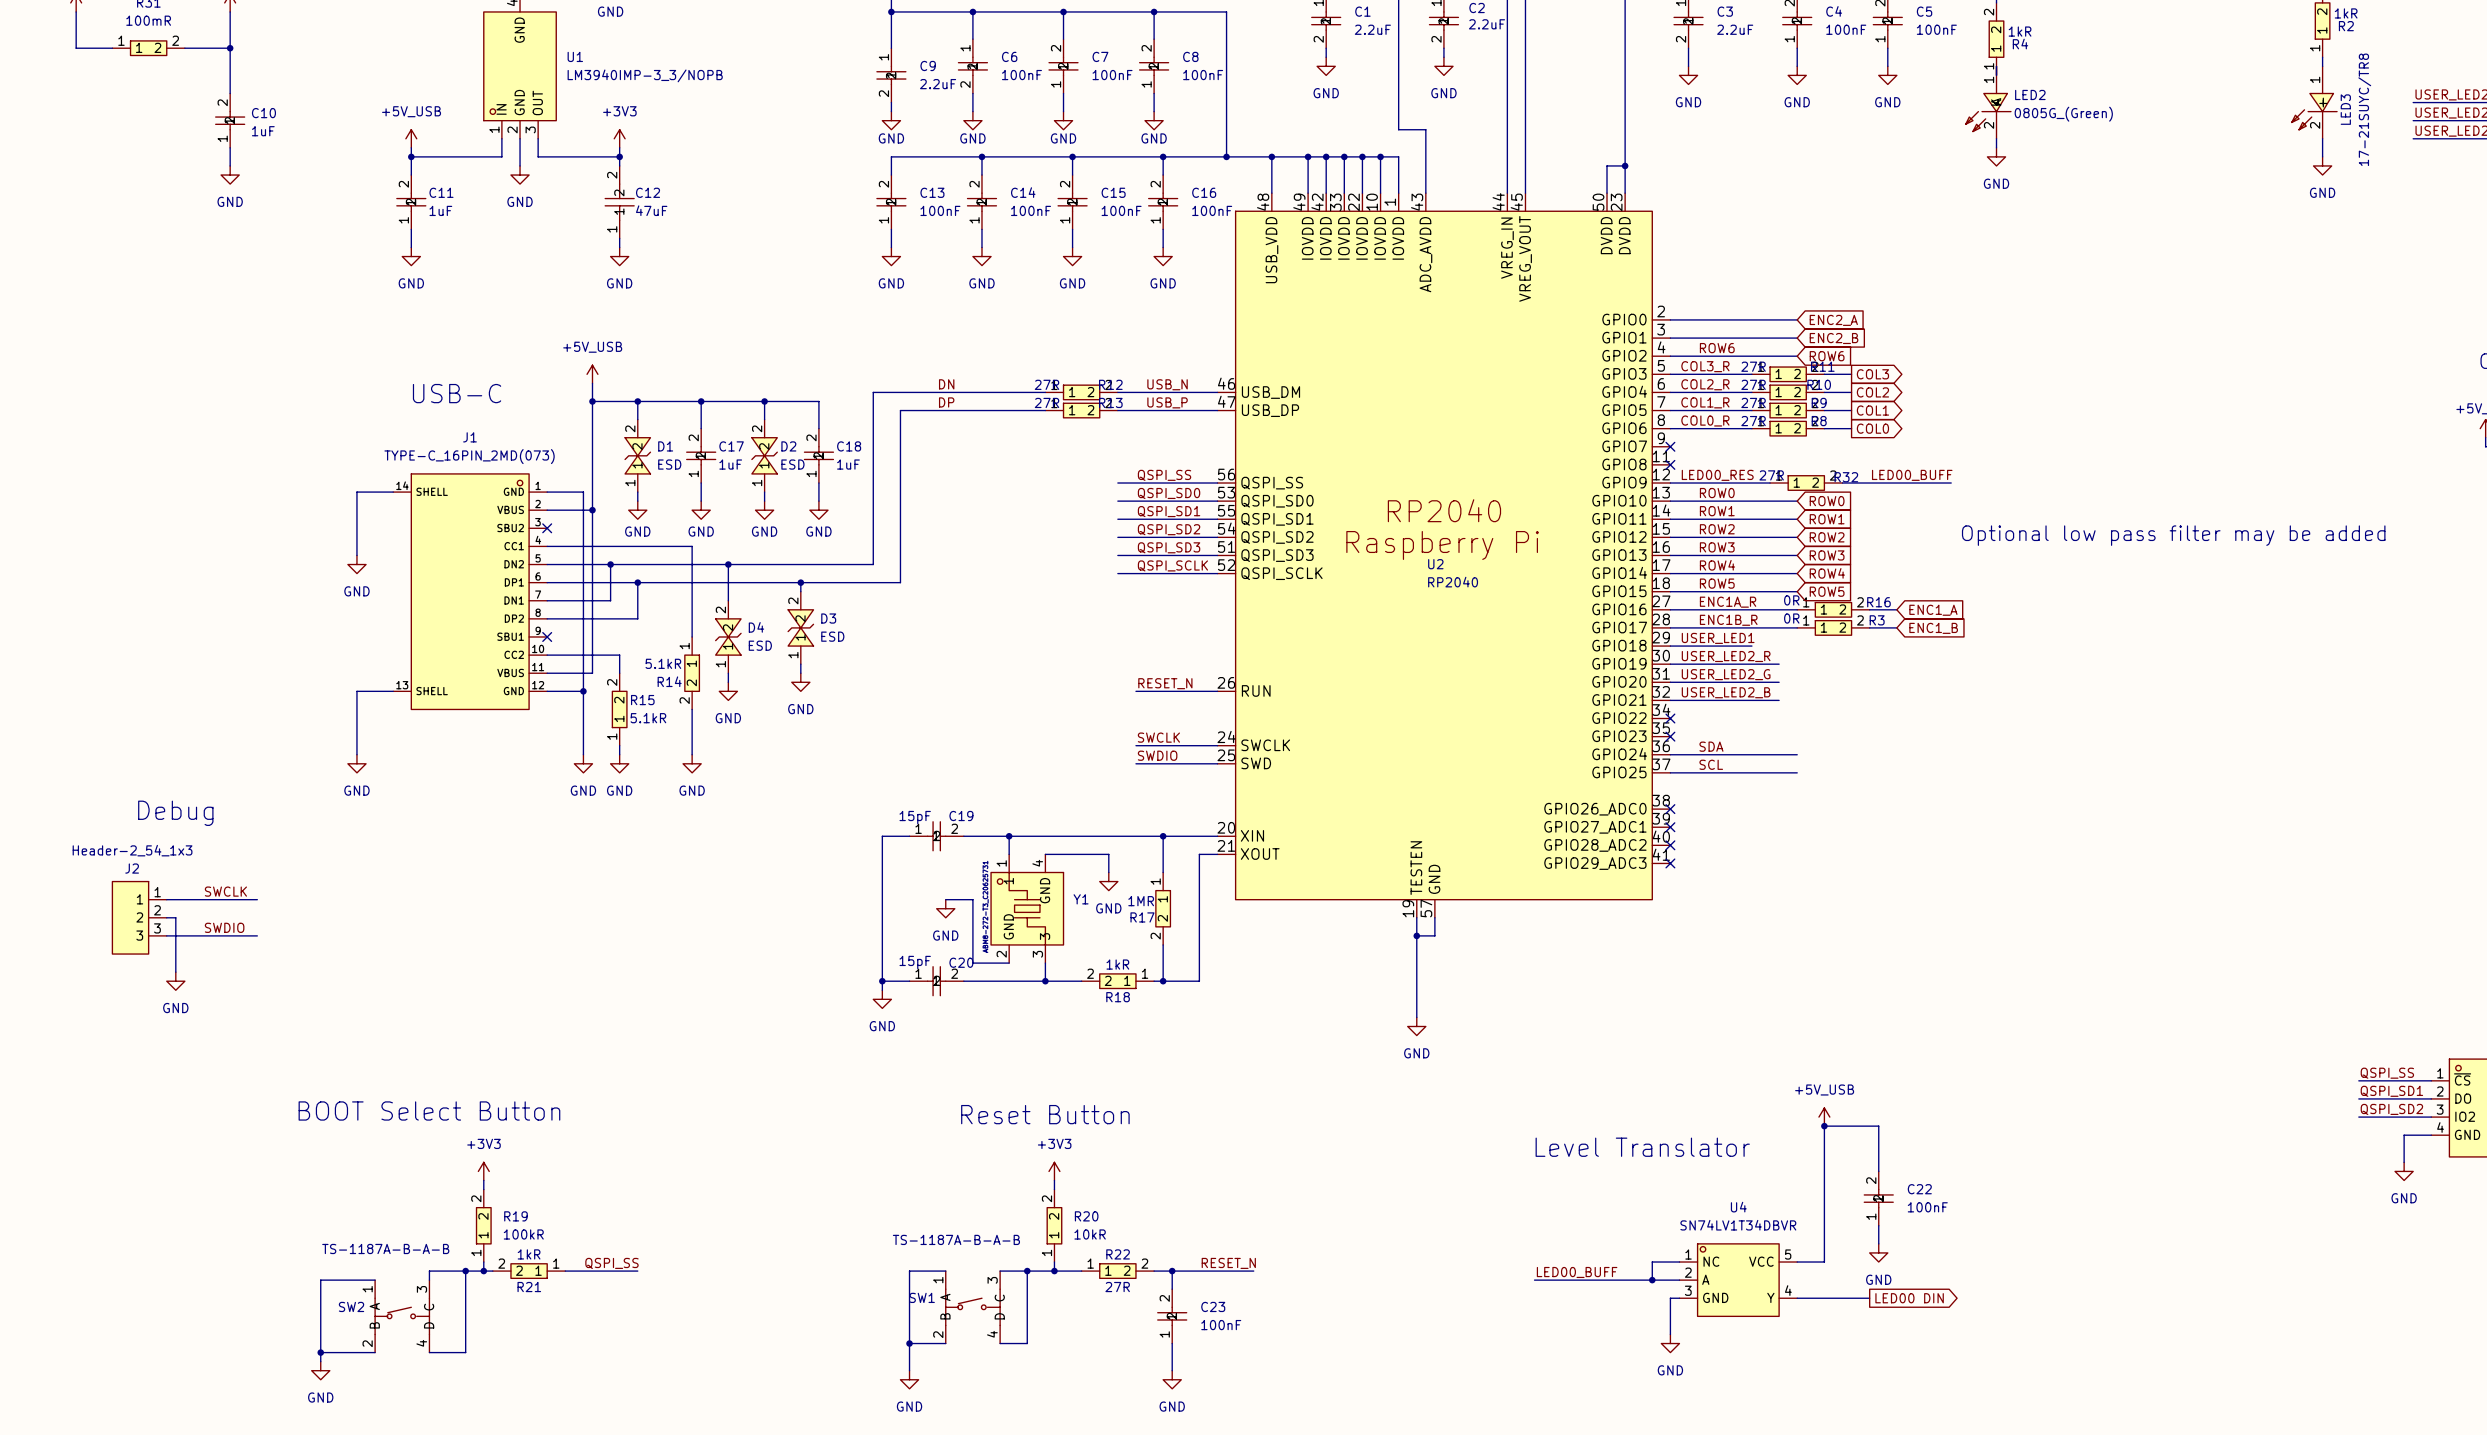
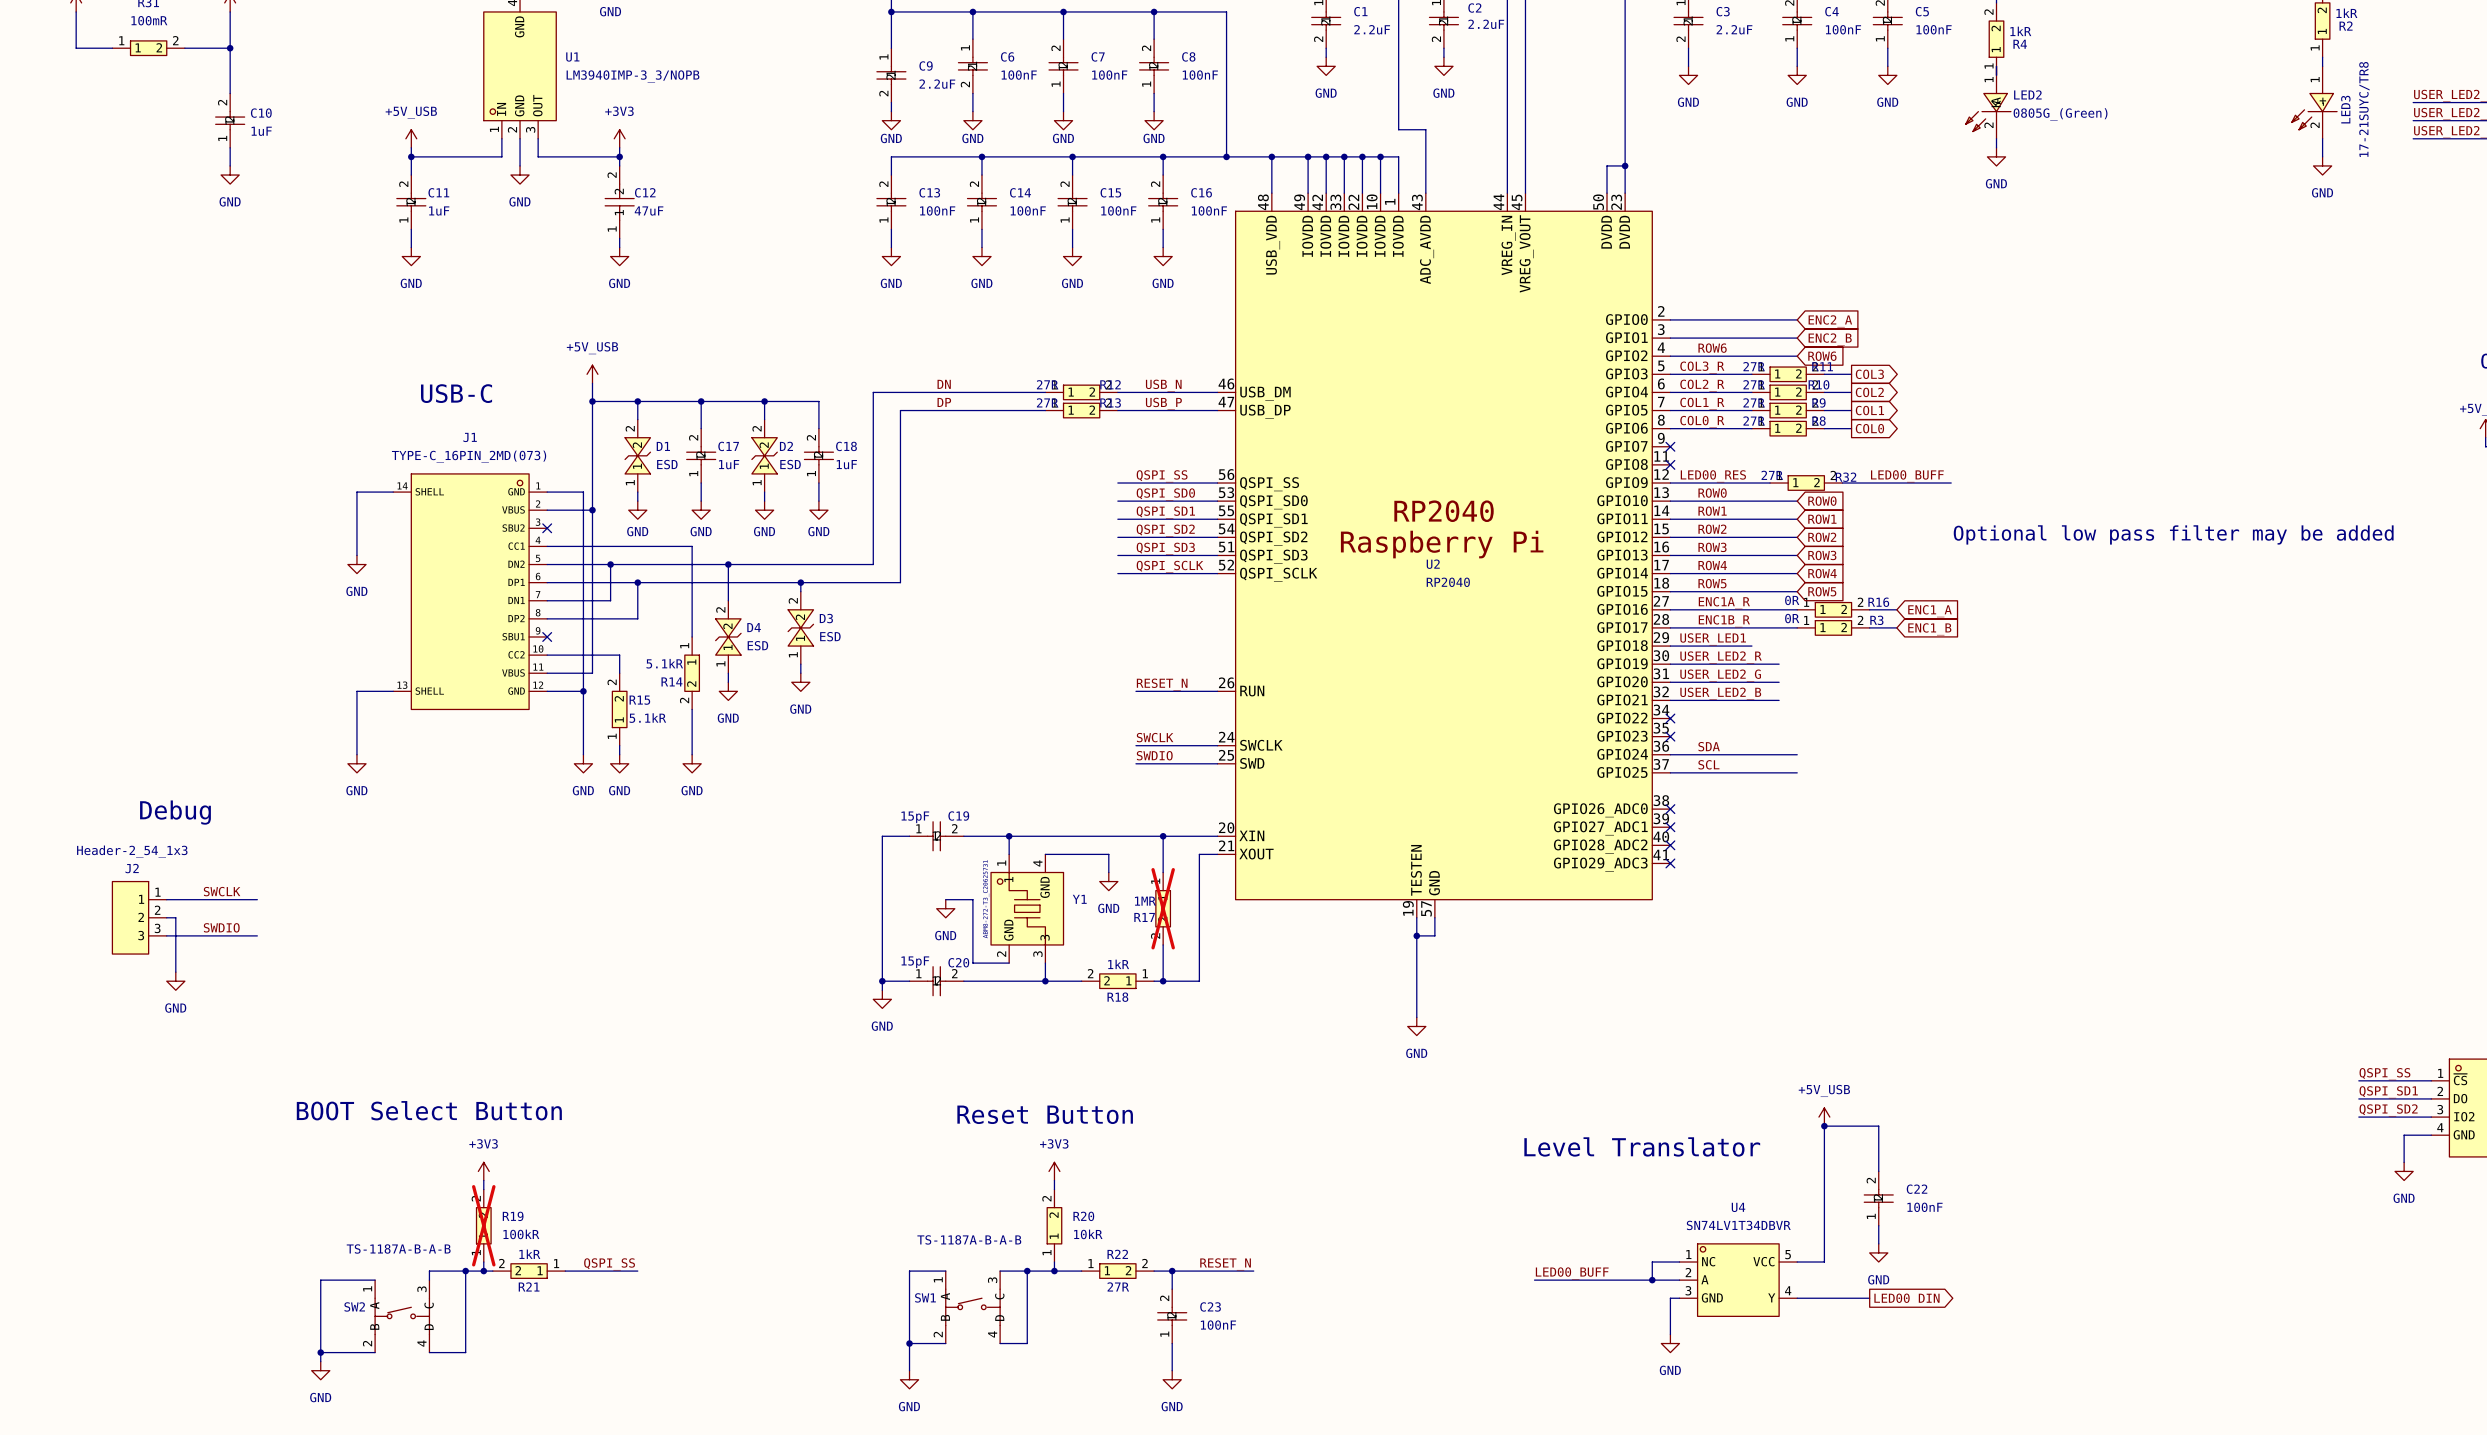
R17 do-not-place cross: none -> (1163, 908)
R19 do-not-place cross: none -> (483, 1225)

